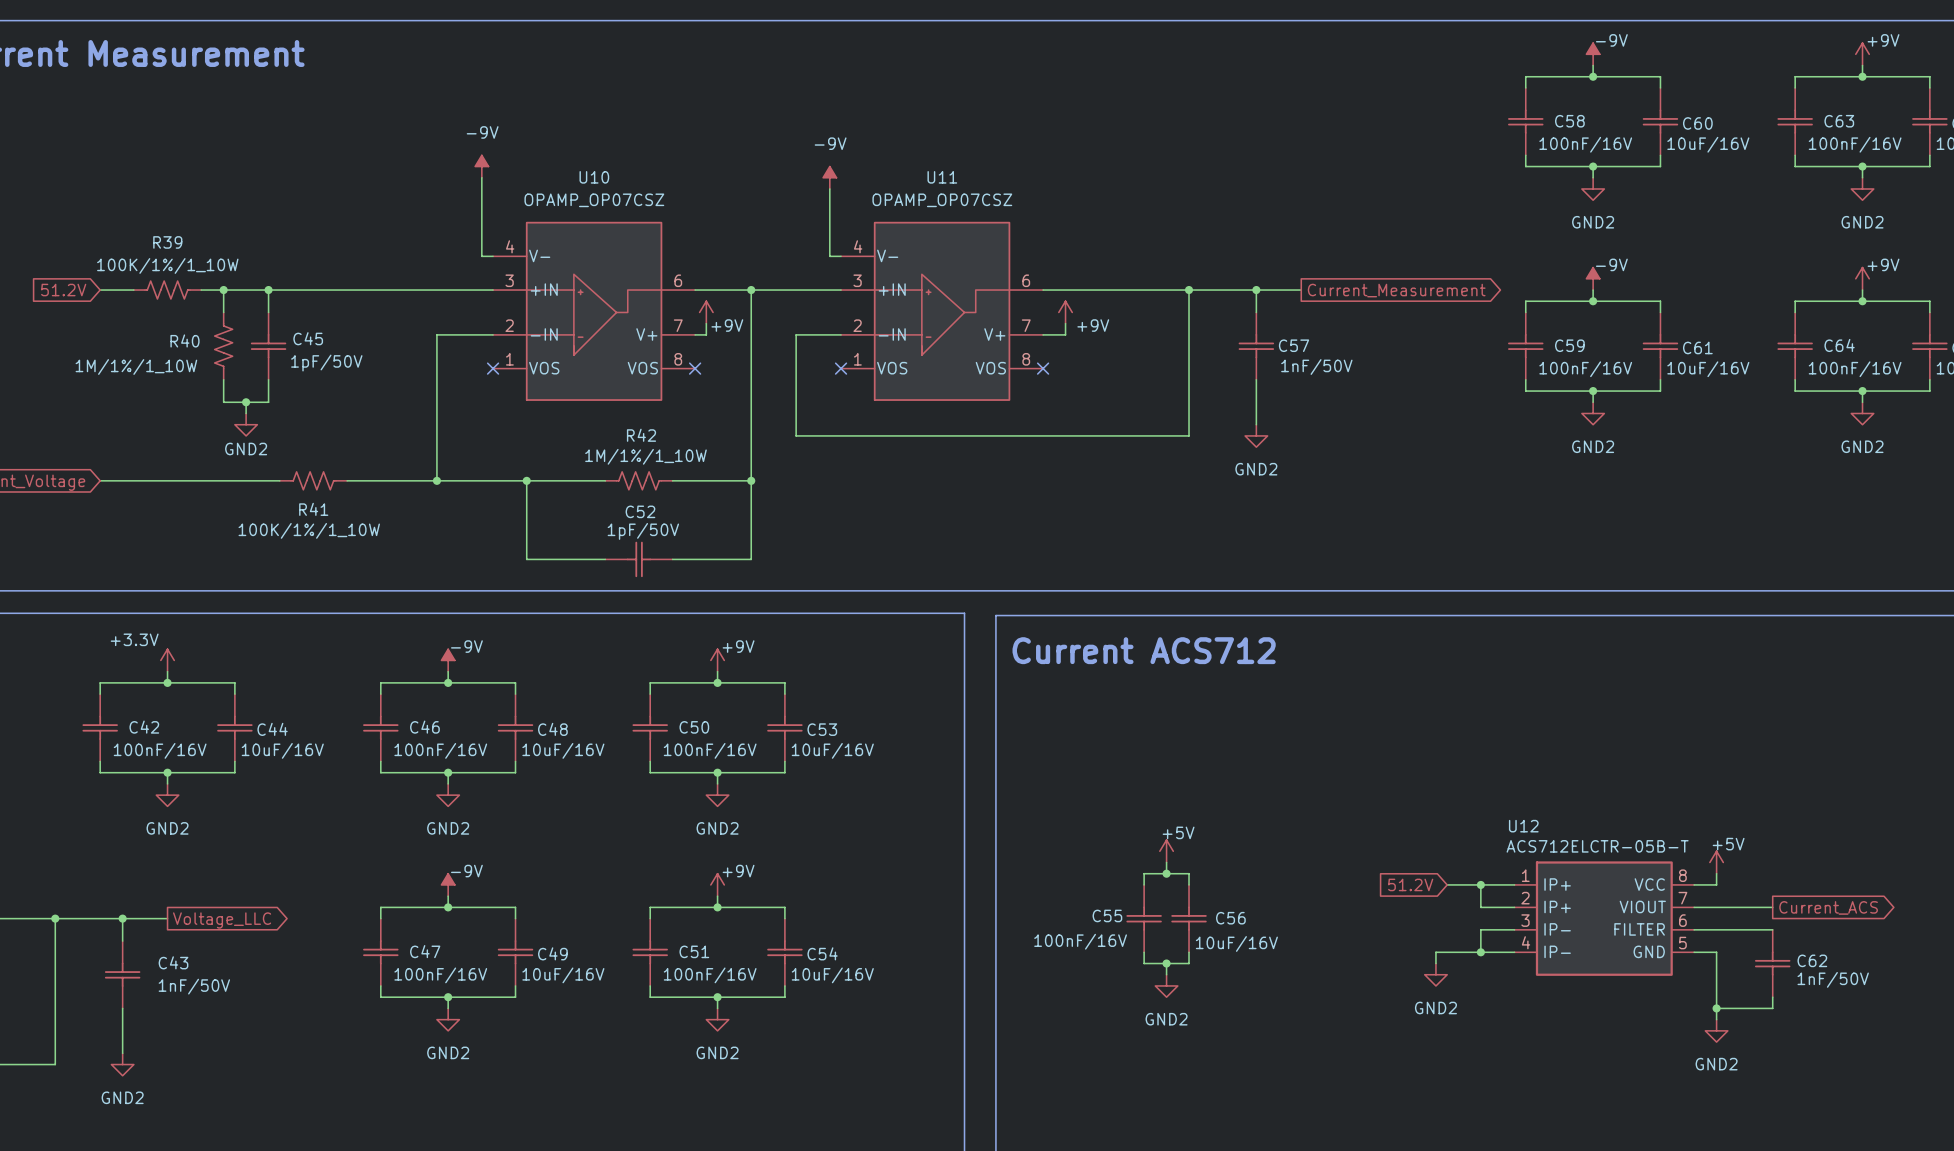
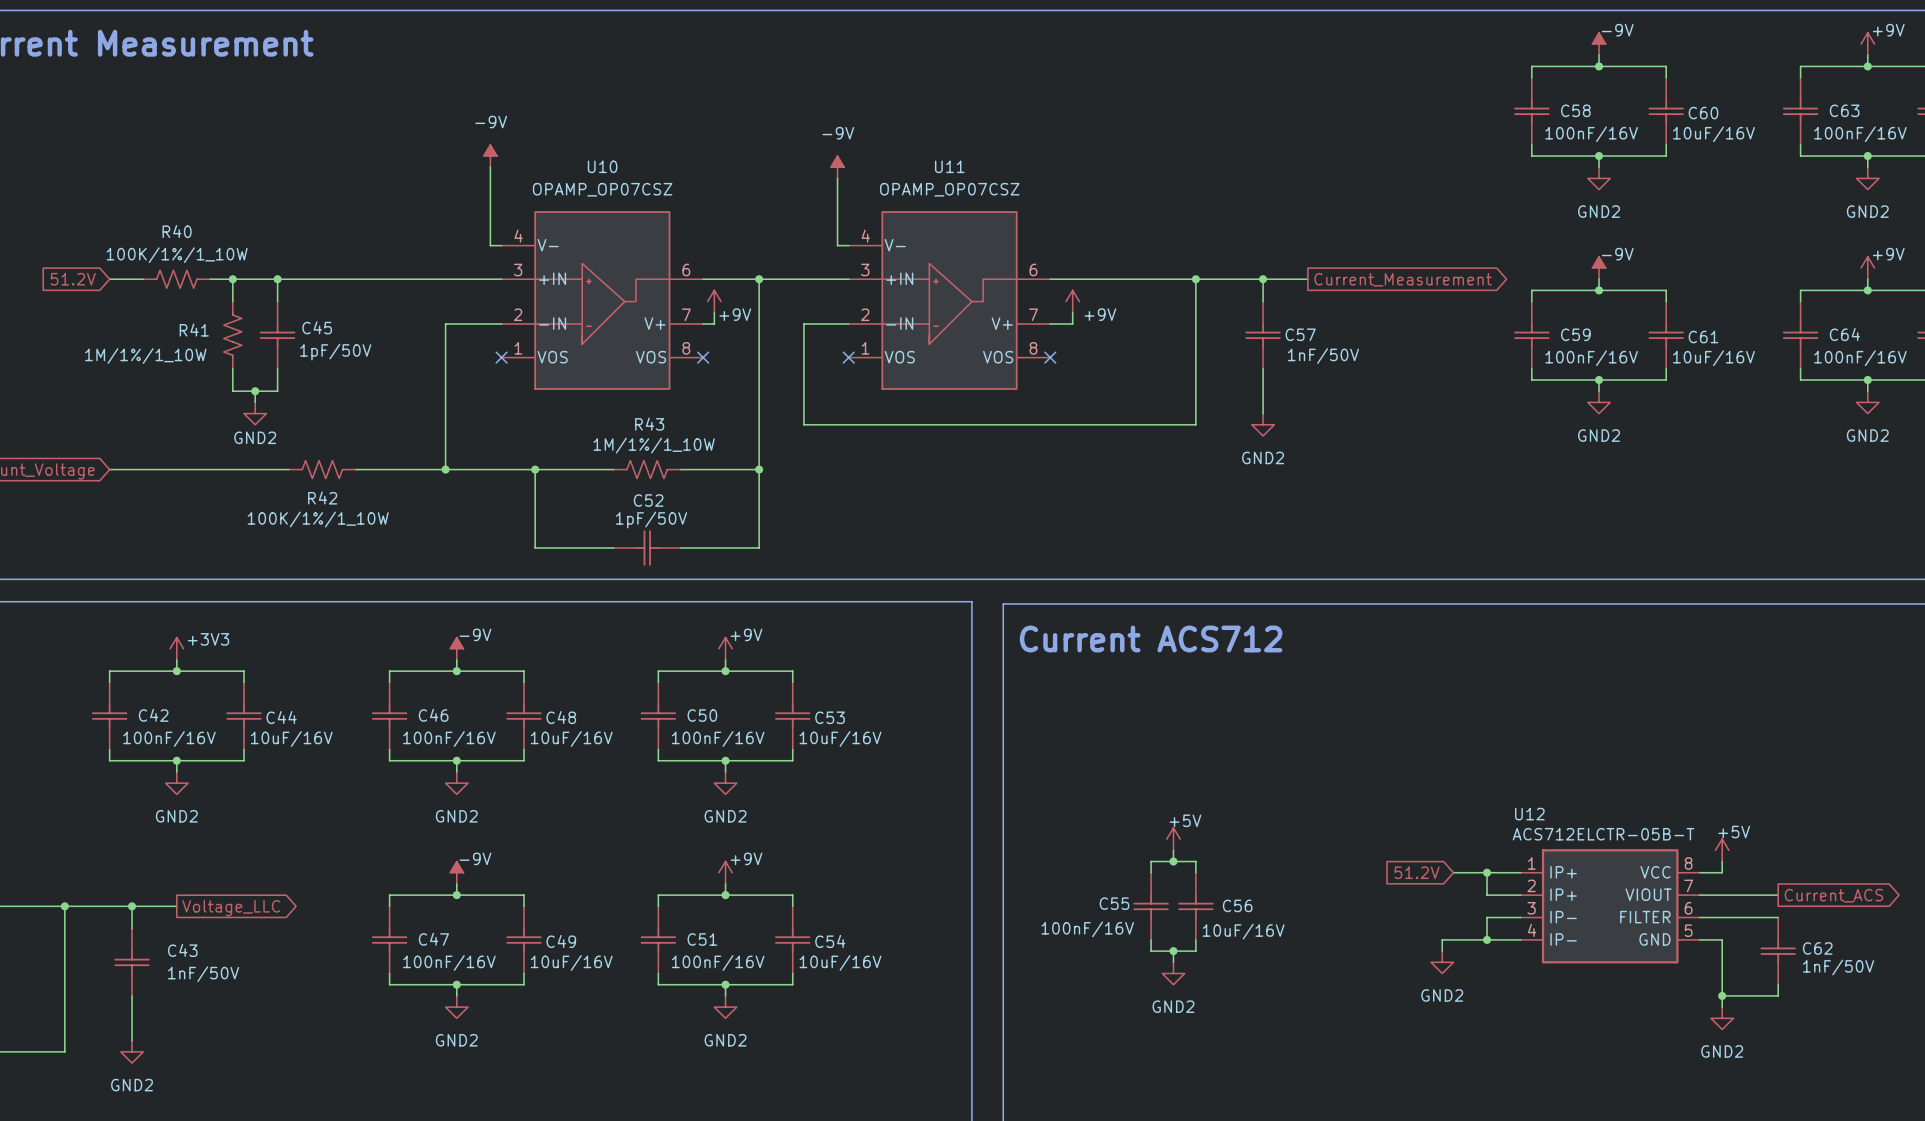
R39 name: R39 (167, 242) -> R40 (177, 231)
R40 name: R40 (184, 340) -> R41 (194, 330)
R42 name: R42 (641, 435) -> R43 (649, 424)
R41 name: R41 (313, 509) -> R42 (322, 498)
power symbol: +3.3V (167, 660) -> +3V3 (176, 648)

